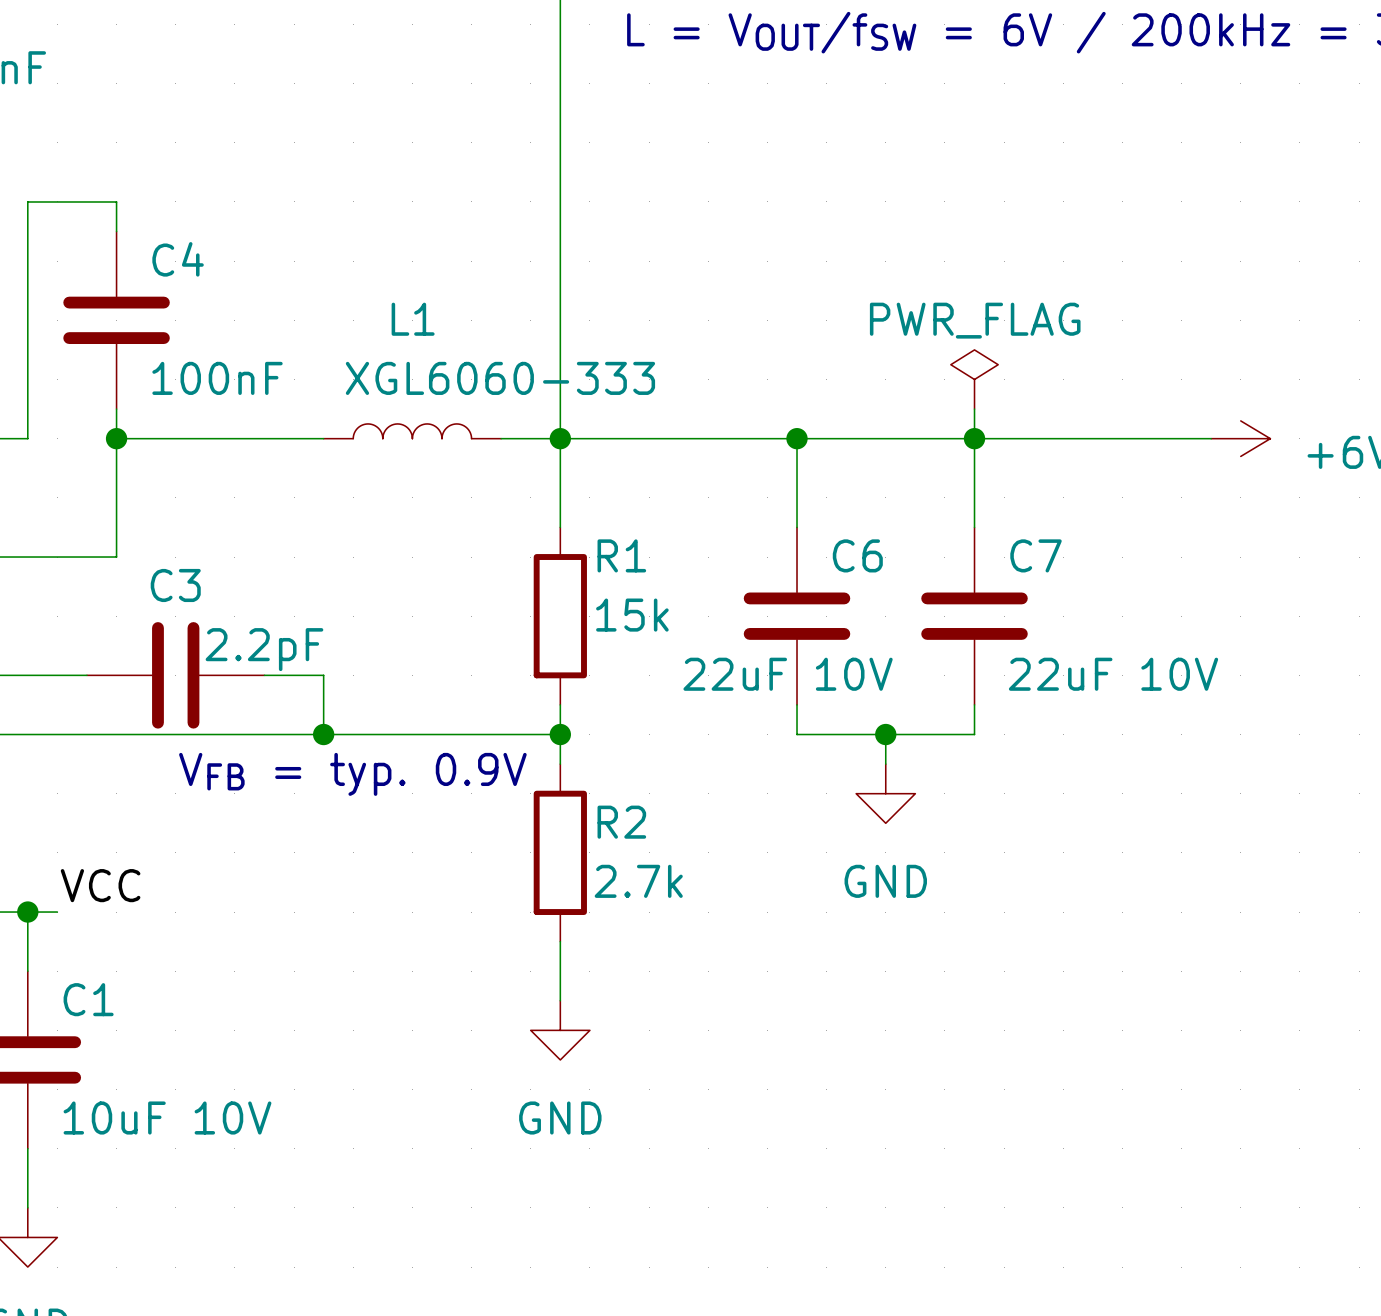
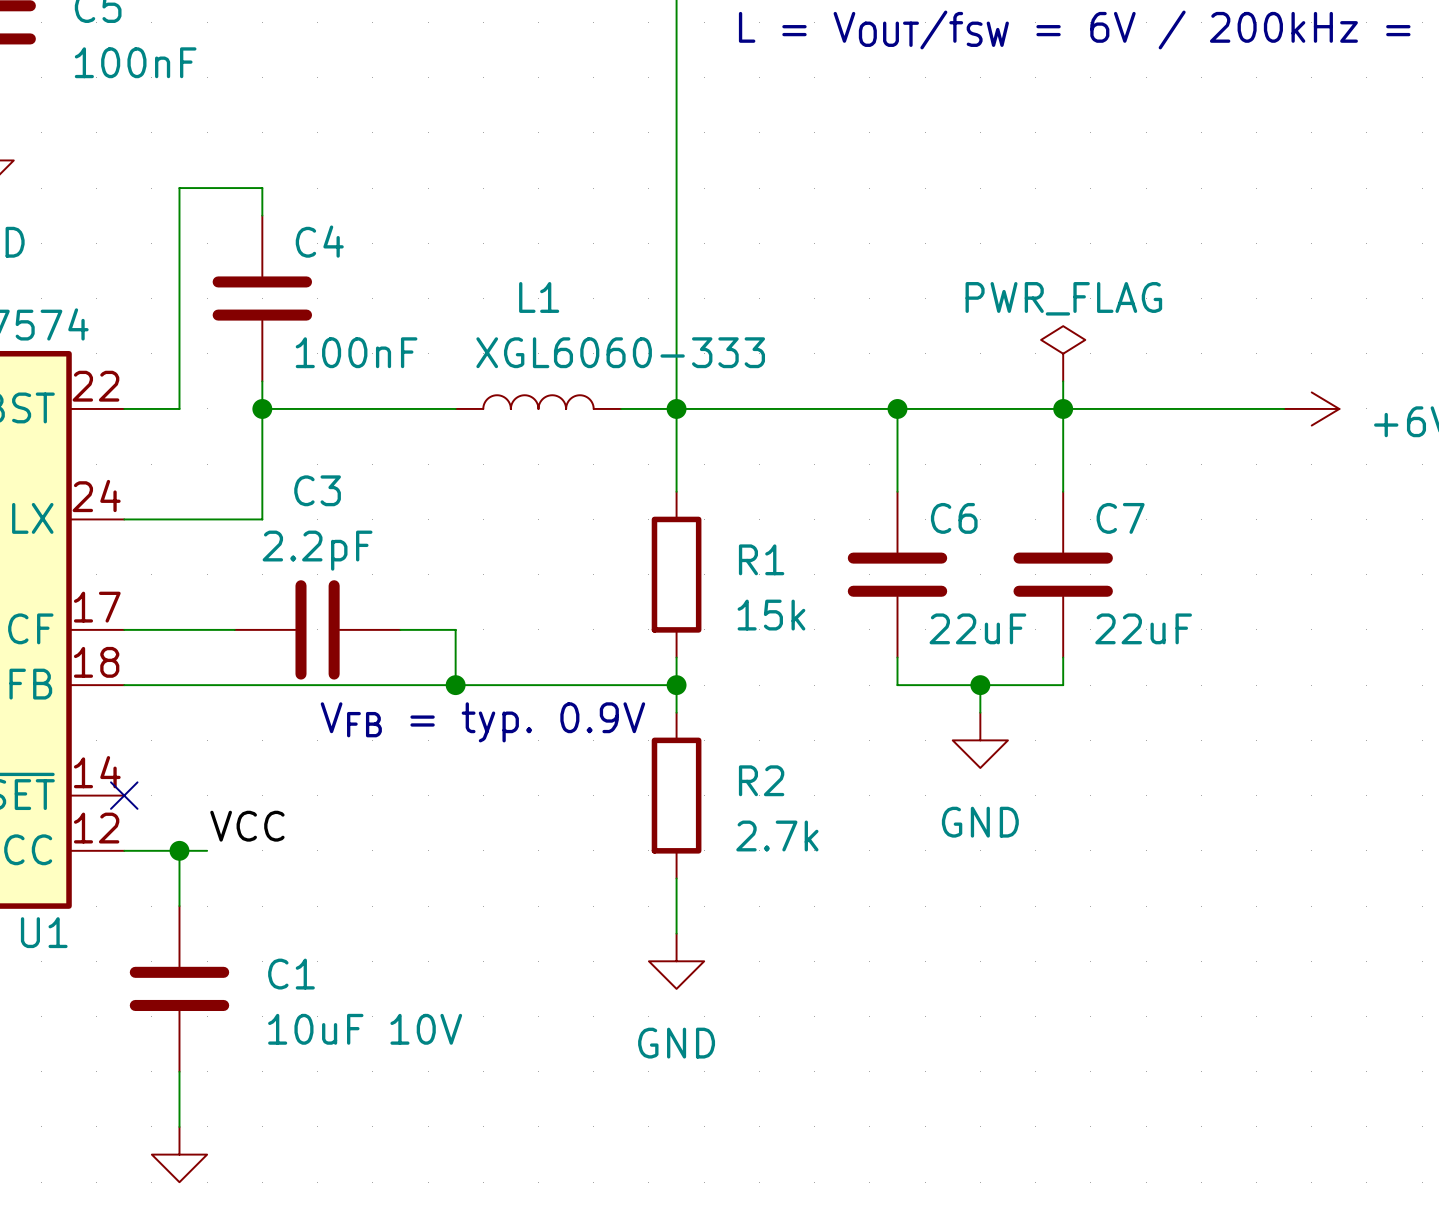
R1 name position: R1 (621, 555) -> R1 (761, 559)
C3 name position: C3 (175, 585) -> C3 (317, 490)
R1 value position: 15k (632, 615) -> 15k (771, 615)
C3 value position: 2.2pF (264, 649) -> 2.2pF (317, 550)
C6 value: 22uF 10V (788, 674) -> 22uF (977, 628)
C7 value: 22uF 10V (1113, 674) -> 22uF (1143, 628)
R2 name position: R2 (621, 822) -> R2 (761, 780)
R2 value position: 2.7k (638, 881) -> 2.7k (777, 835)
C1 name position: C1 (88, 999) -> C1 (291, 974)
C1 value position: 10uF 10V (167, 1118) -> 10uF 10V (365, 1029)

